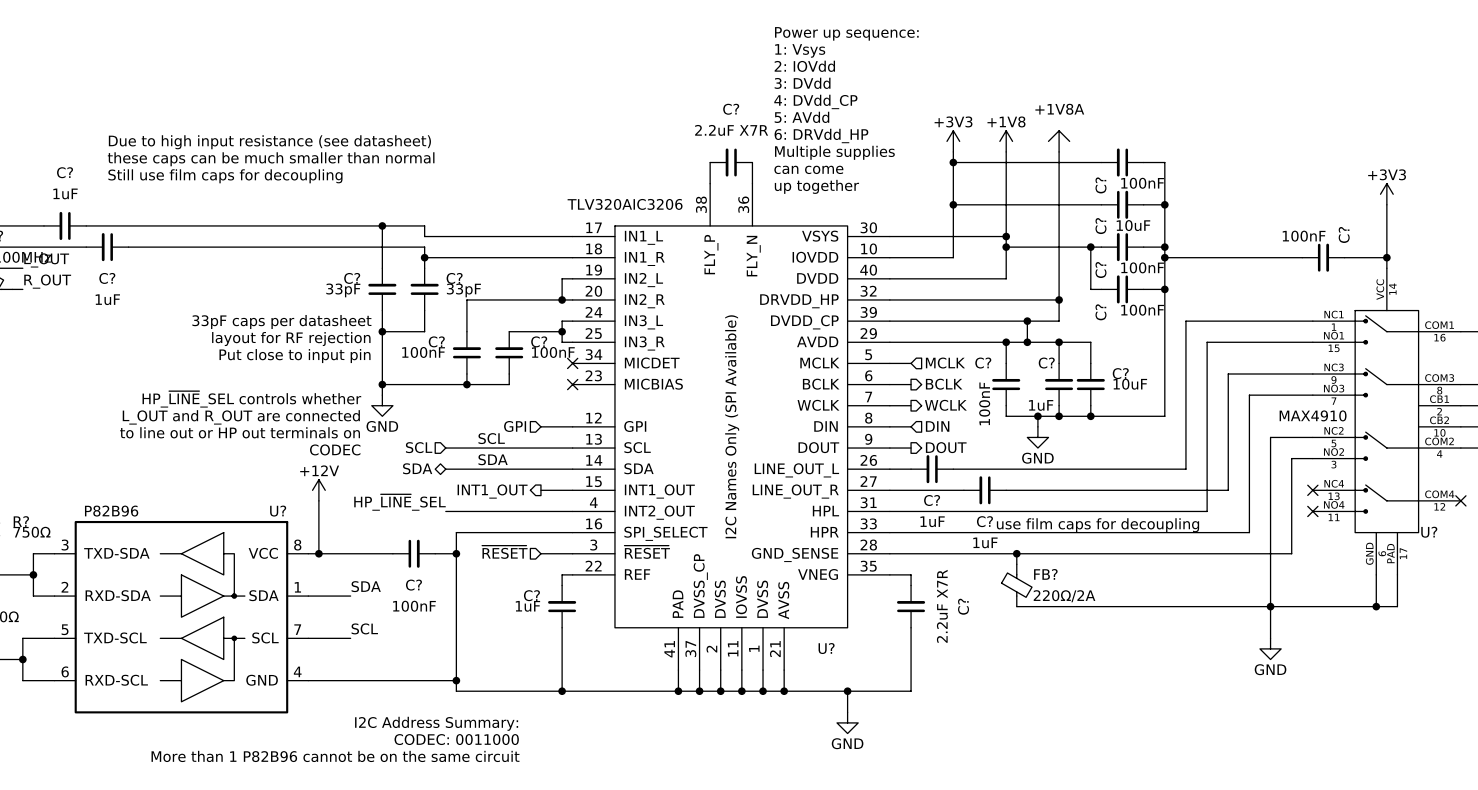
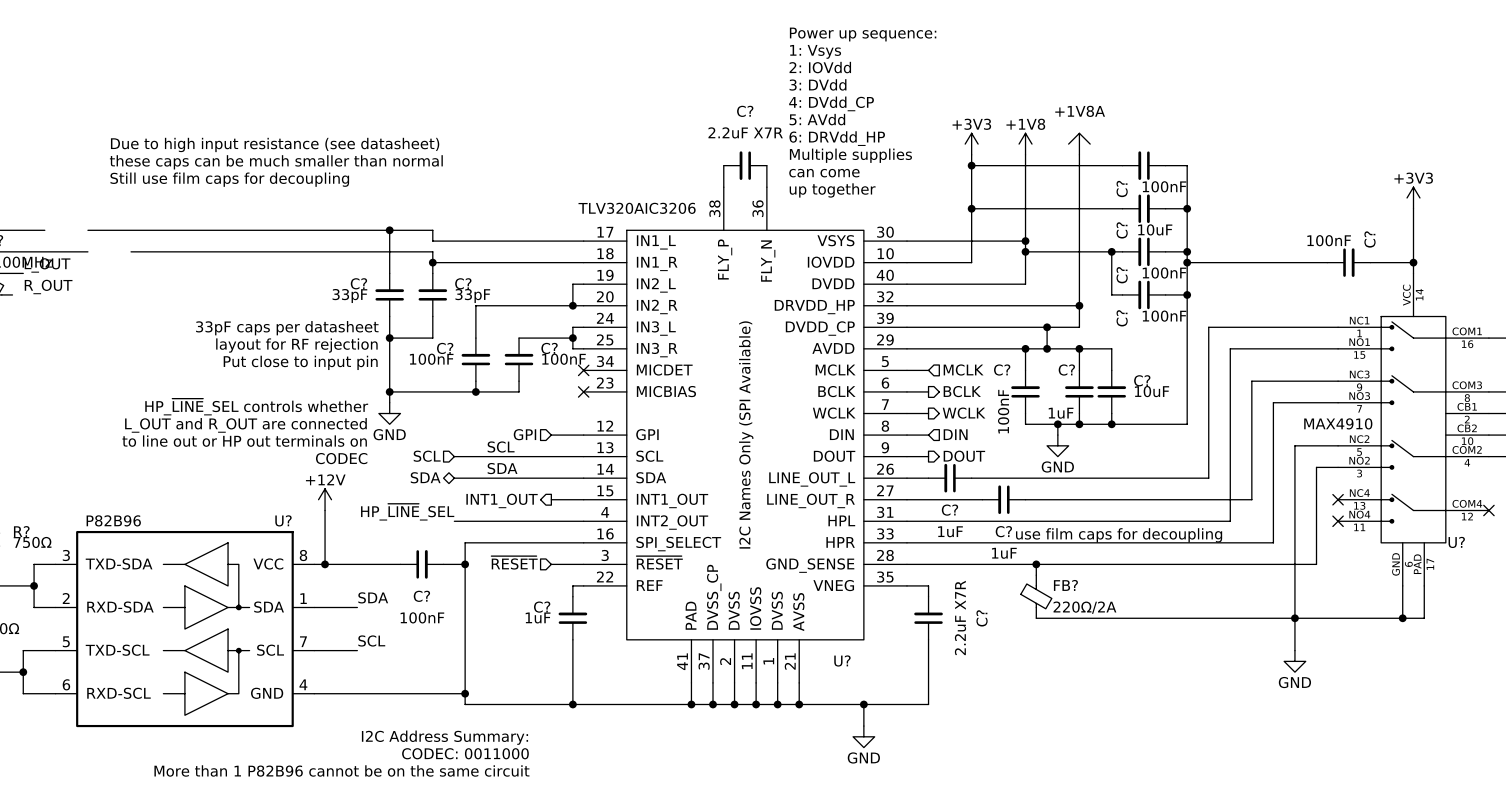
C?: 1uF (65, 225) -> none
C?: 1uF (107, 247) -> none
wire: (12, 289) (22, 289) -> none

